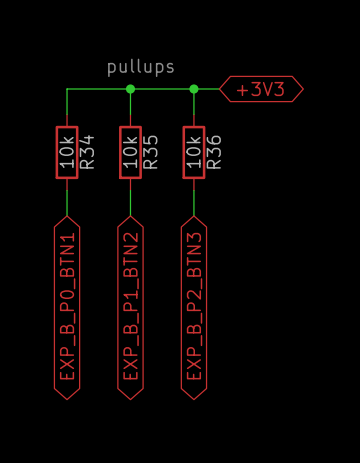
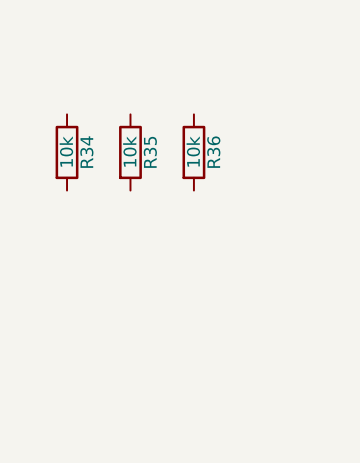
text: pullups (140, 67) -> none
wire: (130, 89) (130, 114) -> none
junction: (130, 89) -> none
wire: (193, 89) (193, 114) -> none
junction: (193, 89) -> none
wire: (219, 89) (67, 89) (67, 114) -> none
global label: +3V3 (260, 89) -> none
wire: (67, 190) (67, 215) -> none
wire: (130, 190) (130, 215) -> none
wire: (193, 190) (193, 215) -> none
global label: EXP_B_P0_BTN1 (67, 306) -> none
global label: EXP_B_P1_BTN2 (131, 306) -> none
global label: EXP_B_P2_BTN3 (194, 306) -> none

